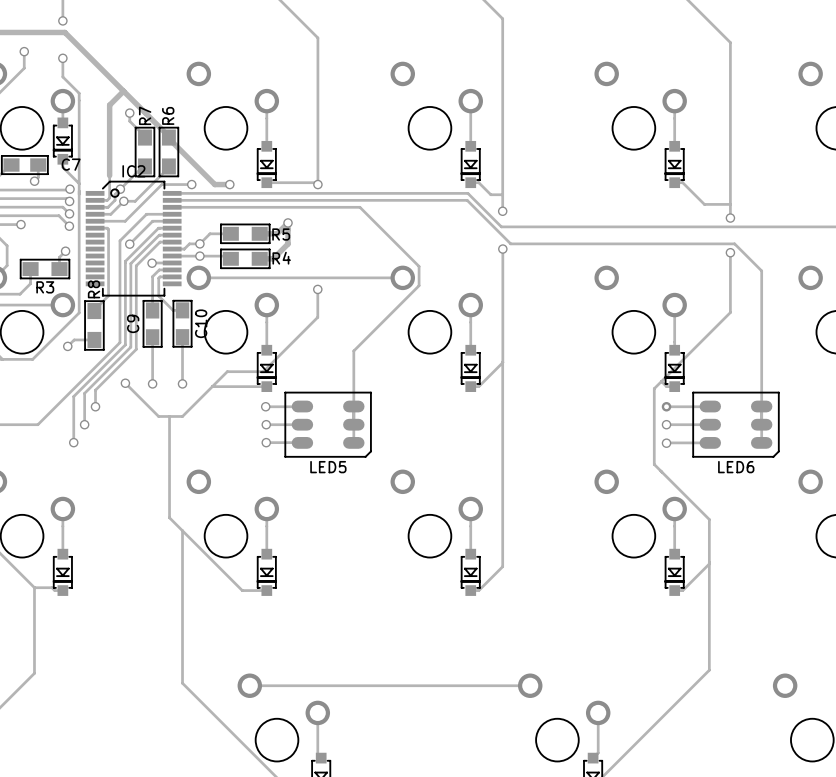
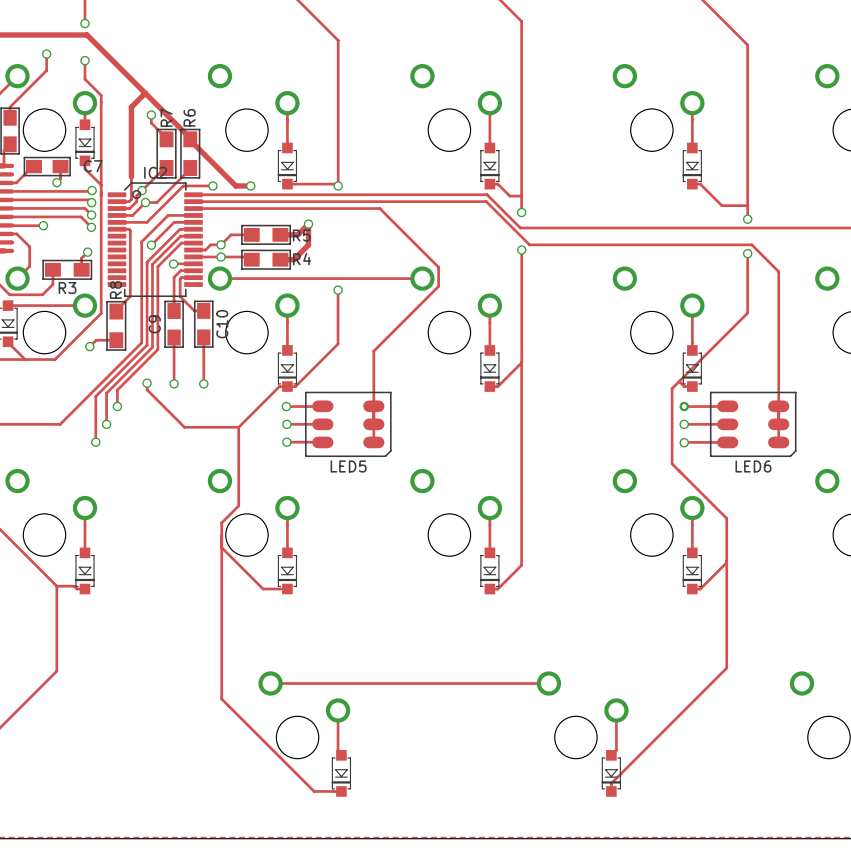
track: (317, 317) (263, 371) (227, 371) (182, 416) (158, 416) (125, 383) -> (338, 317) (338, 343) (295, 386) (287, 386)
track: none -> (147, 383) (147, 389) (184, 427) (238, 427)
track: (212, 386) (258, 386) -> (238, 427) (279, 386)
track: (169, 416) (169, 517) (200, 548) -> none
track: (182, 530) (182, 683) (200, 701) -> (238, 427) (238, 505) (221, 522) (221, 698)

